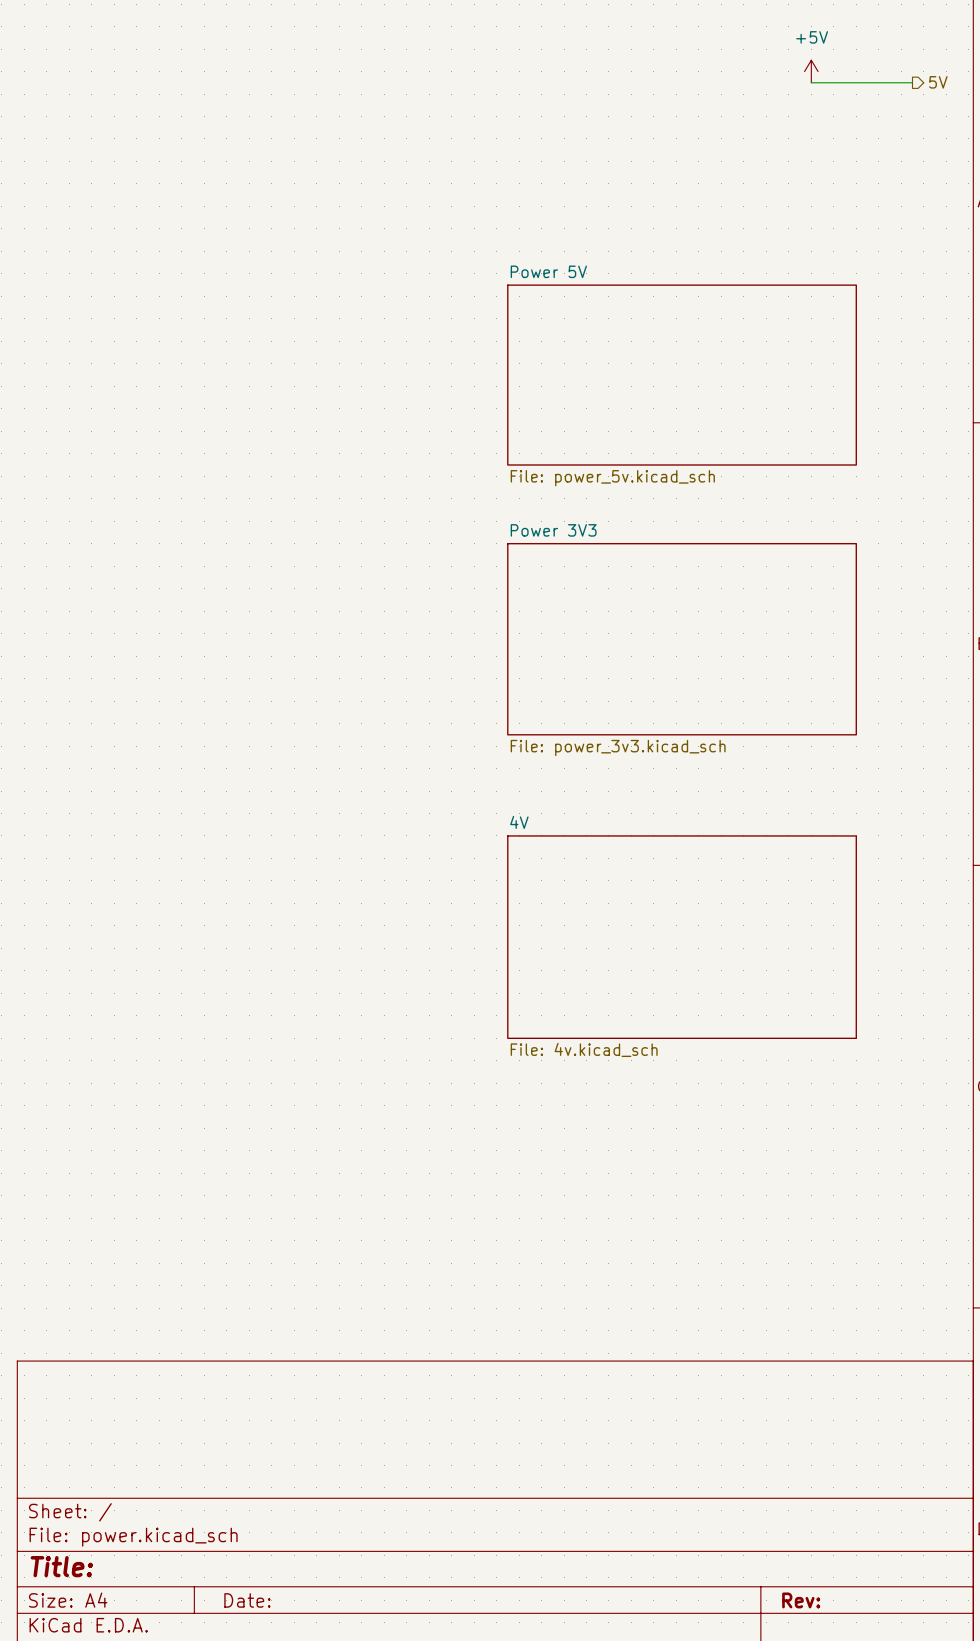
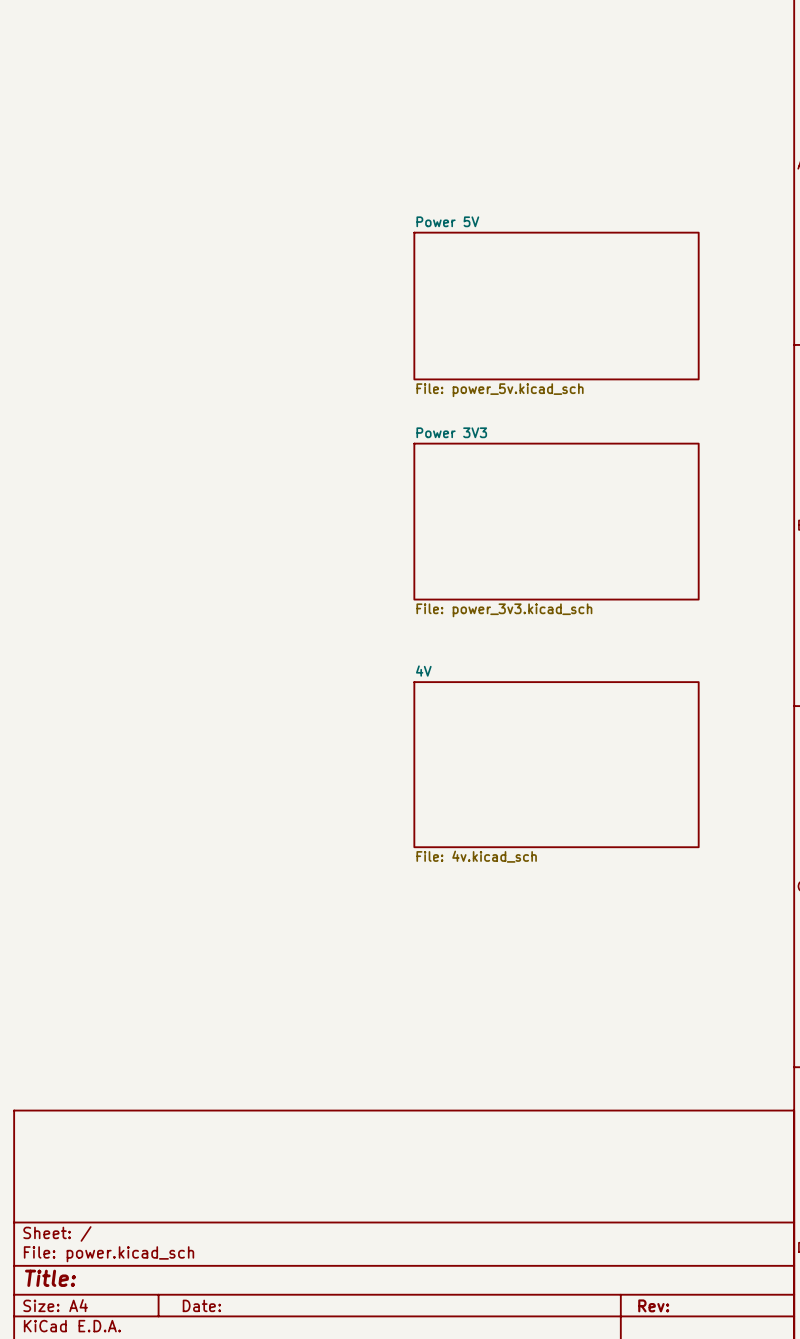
power symbol: +5V (811, 71) -> none
wire: (811, 82) (912, 82) -> none
hierarchical label: 5V (938, 82) -> none

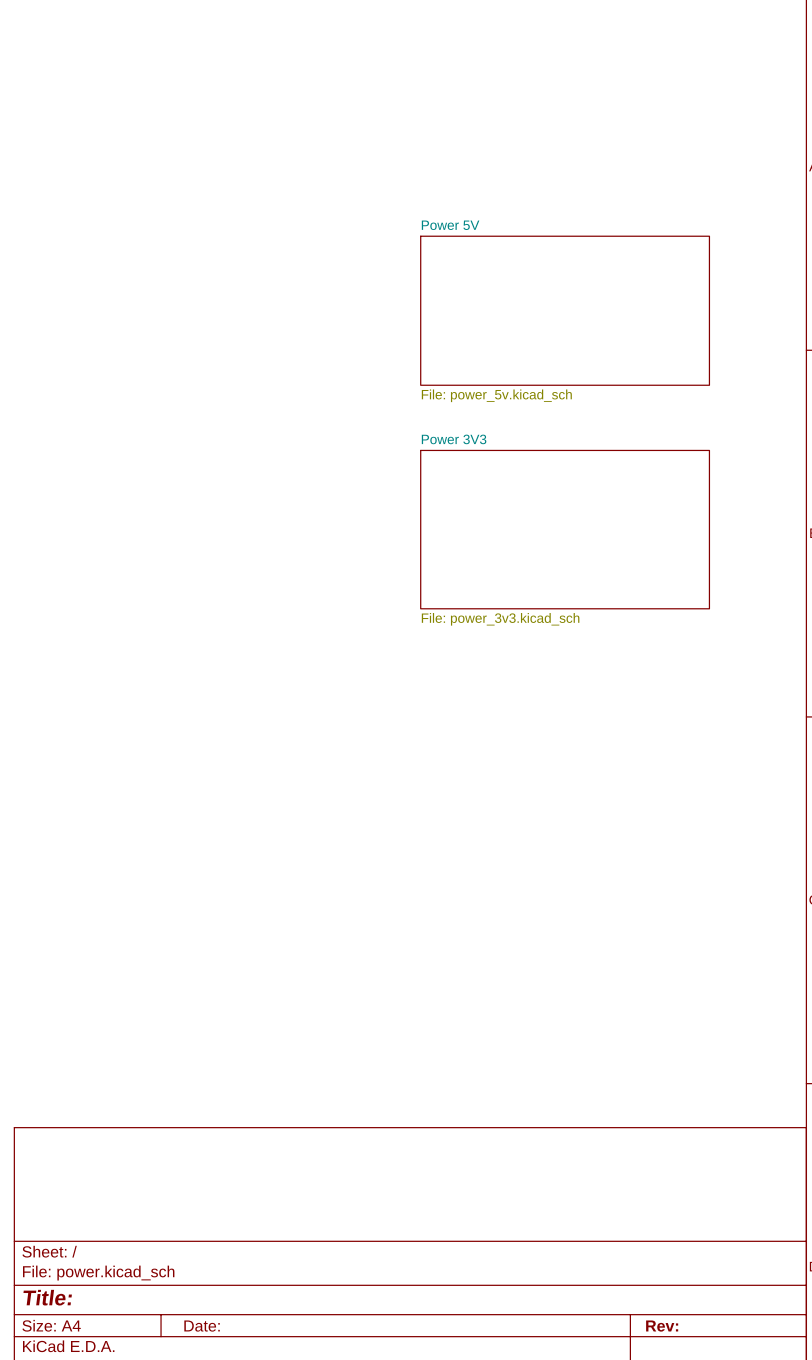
sheet 4V: File: 4v.kicad_sch (556, 764) -> none

